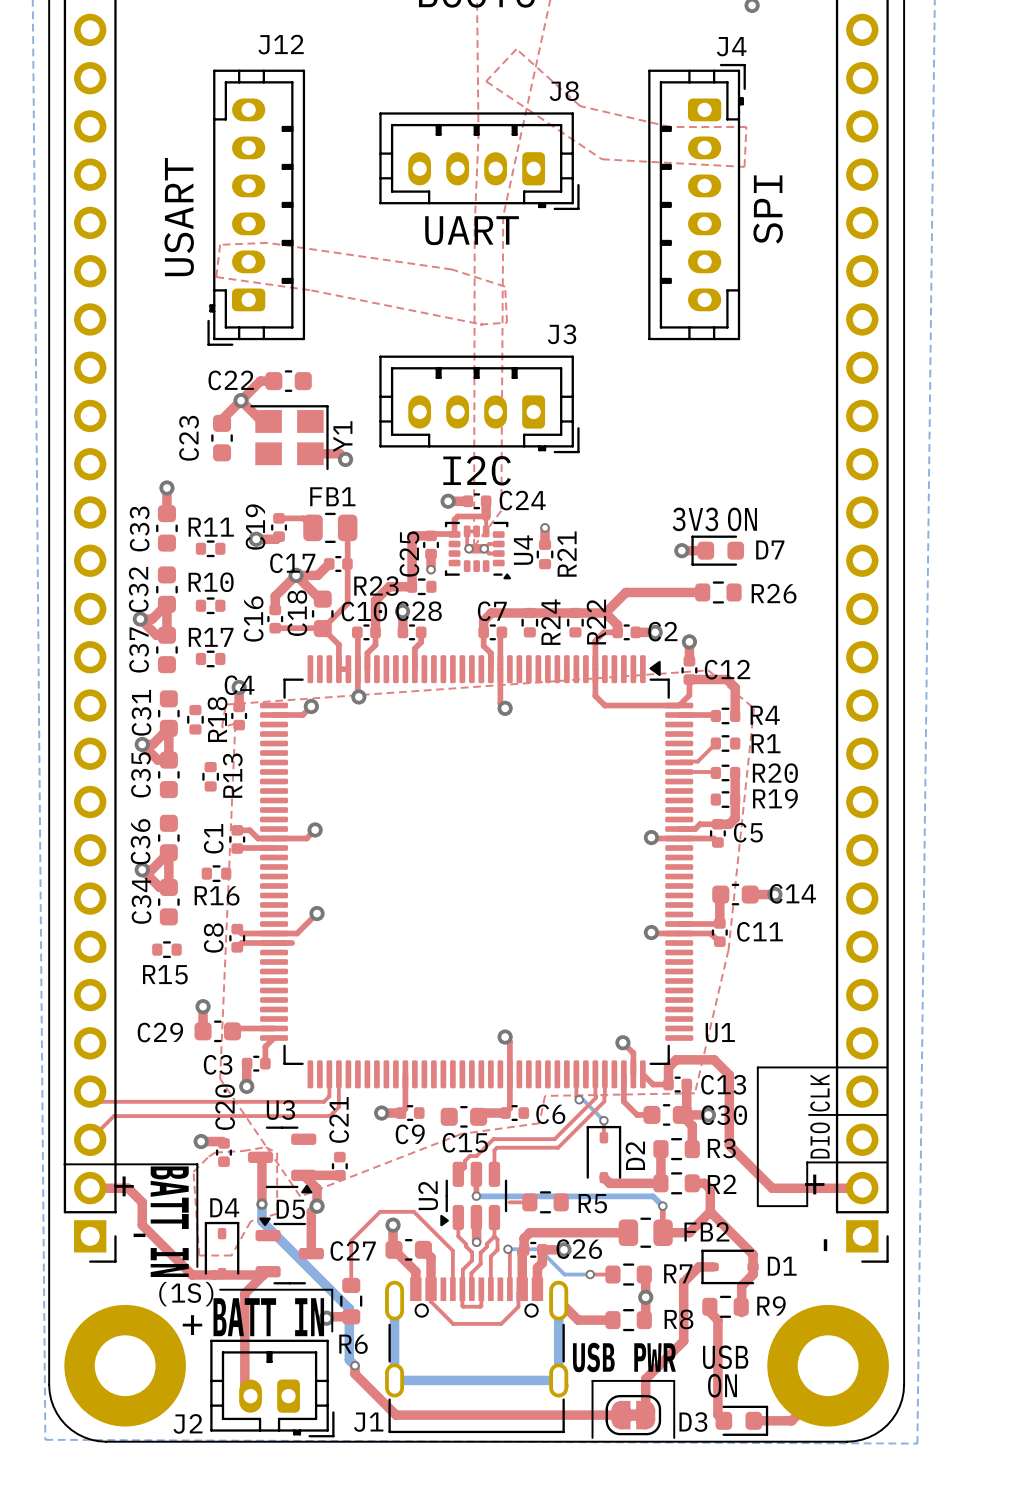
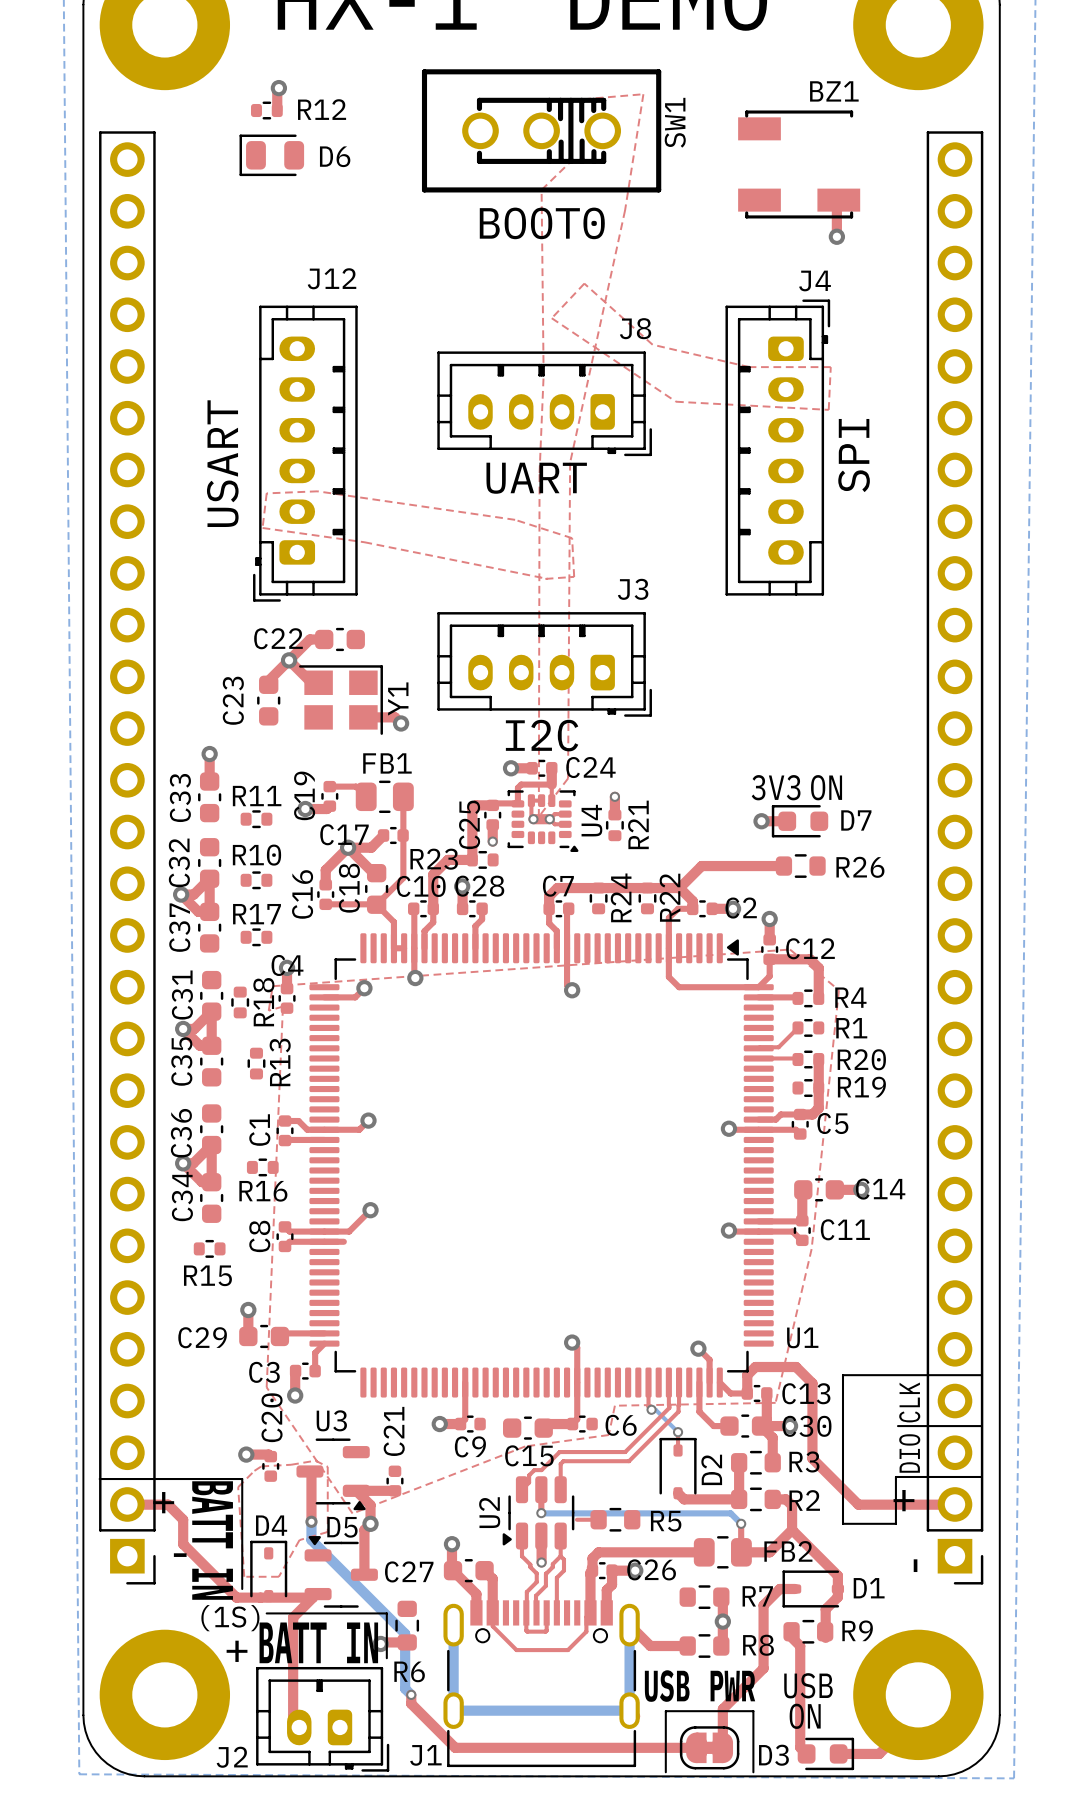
top track: (329, 1074) (329, 1096) (323, 1101) (100, 1101) (90, 1091) -> none
top track: (338, 1074) (338, 1107) (329, 1116) (113, 1116) (90, 1139) -> none
top track: (507, 1249) (509, 1251) (509, 1289) -> none
bottom track: (507, 1249) (539, 1249) (564, 1274) (590, 1274) -> none
via: (507, 1249) -> none
top track: (590, 1274) (612, 1274) -> none
via: (590, 1274) -> none
top track: (351, 1285) (351, 1240) (380, 1211) (413, 1211) (452, 1250) (452, 1289) -> none

